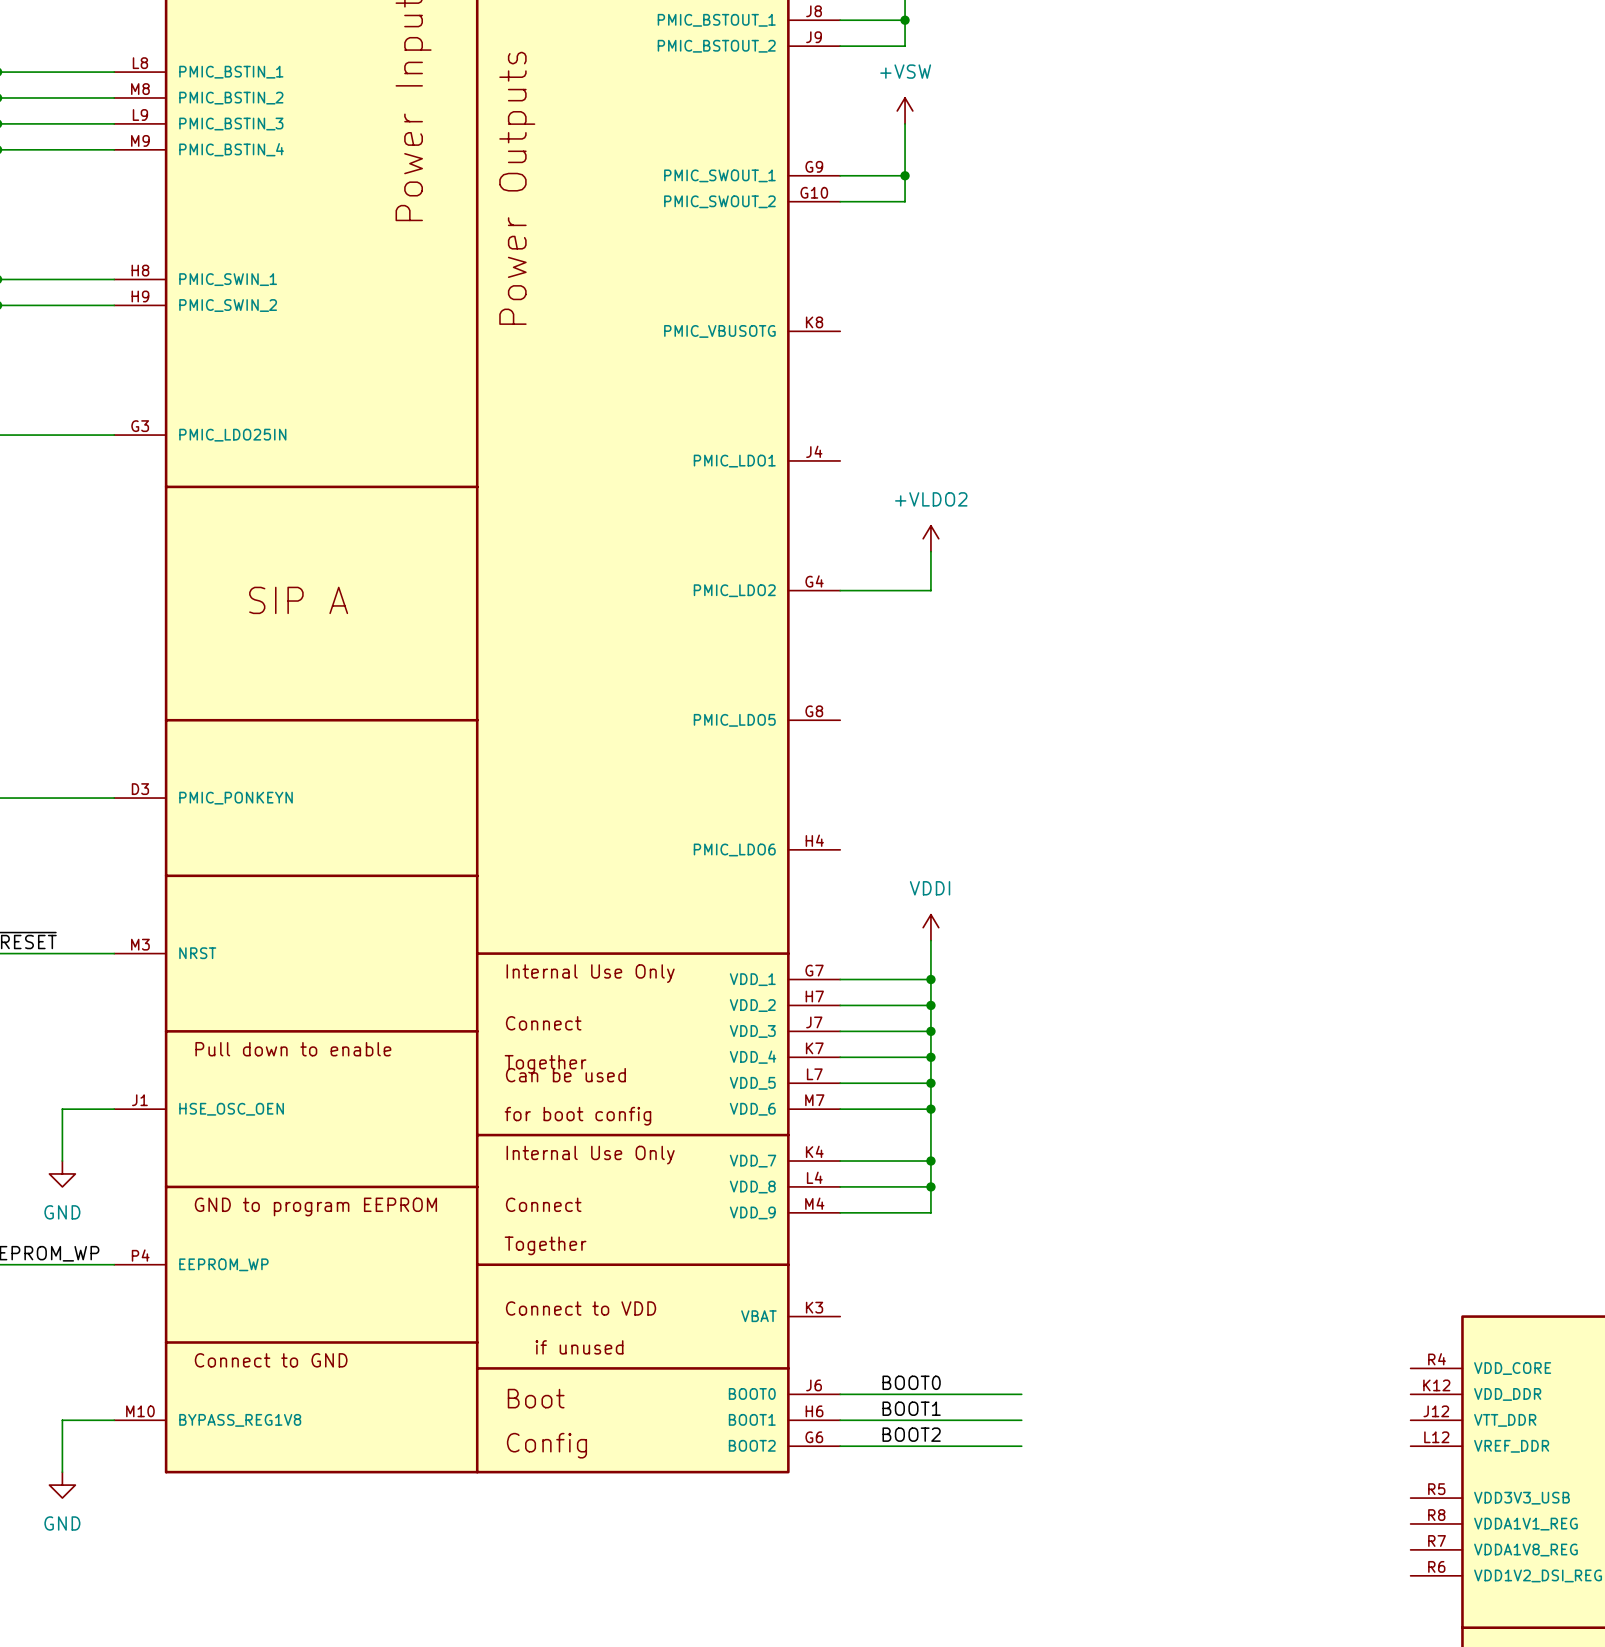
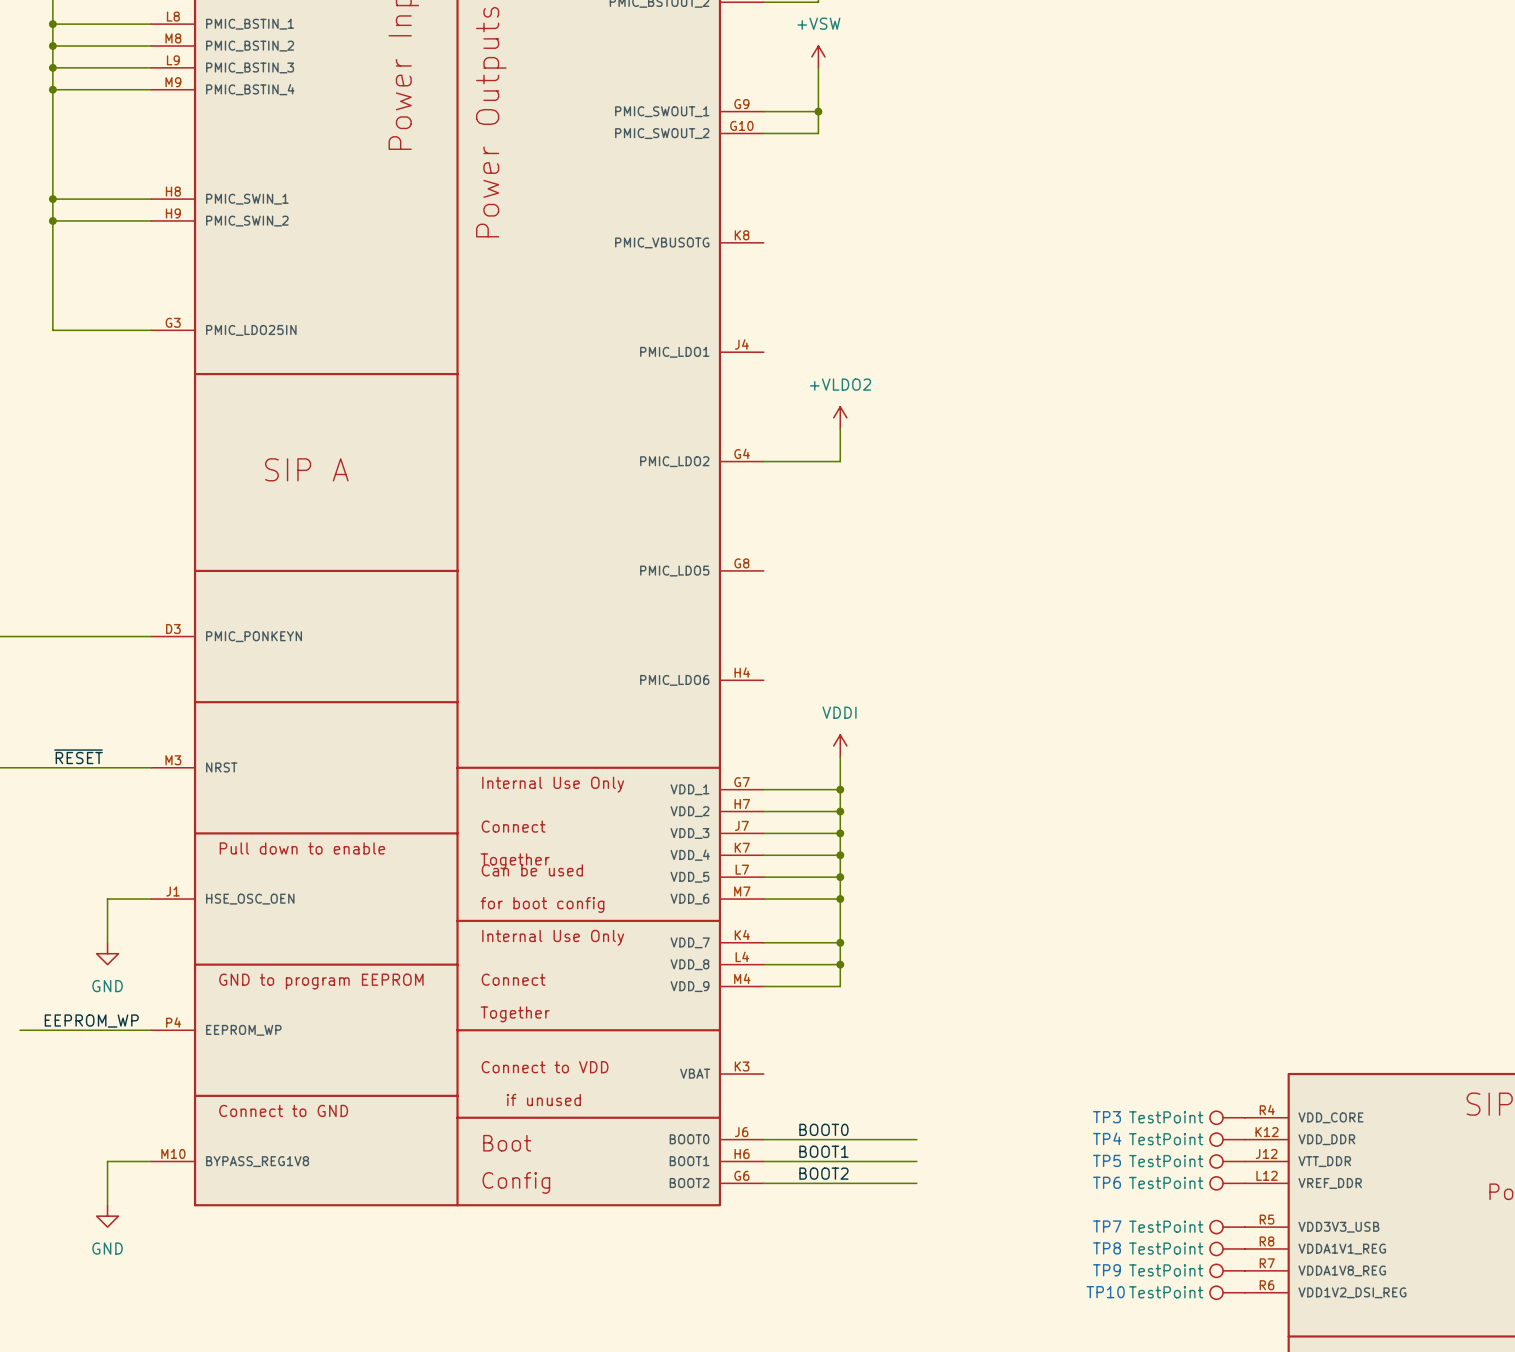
TP3: none -> TestPoint (1227, 1117)
TP4: none -> TestPoint (1227, 1139)
TP5: none -> TestPoint (1227, 1161)
TP6: none -> TestPoint (1227, 1183)
TP7: none -> TestPoint (1227, 1227)
TP8: none -> TestPoint (1227, 1248)
TP9: none -> TestPoint (1227, 1270)
TP10: none -> TestPoint (1227, 1292)

